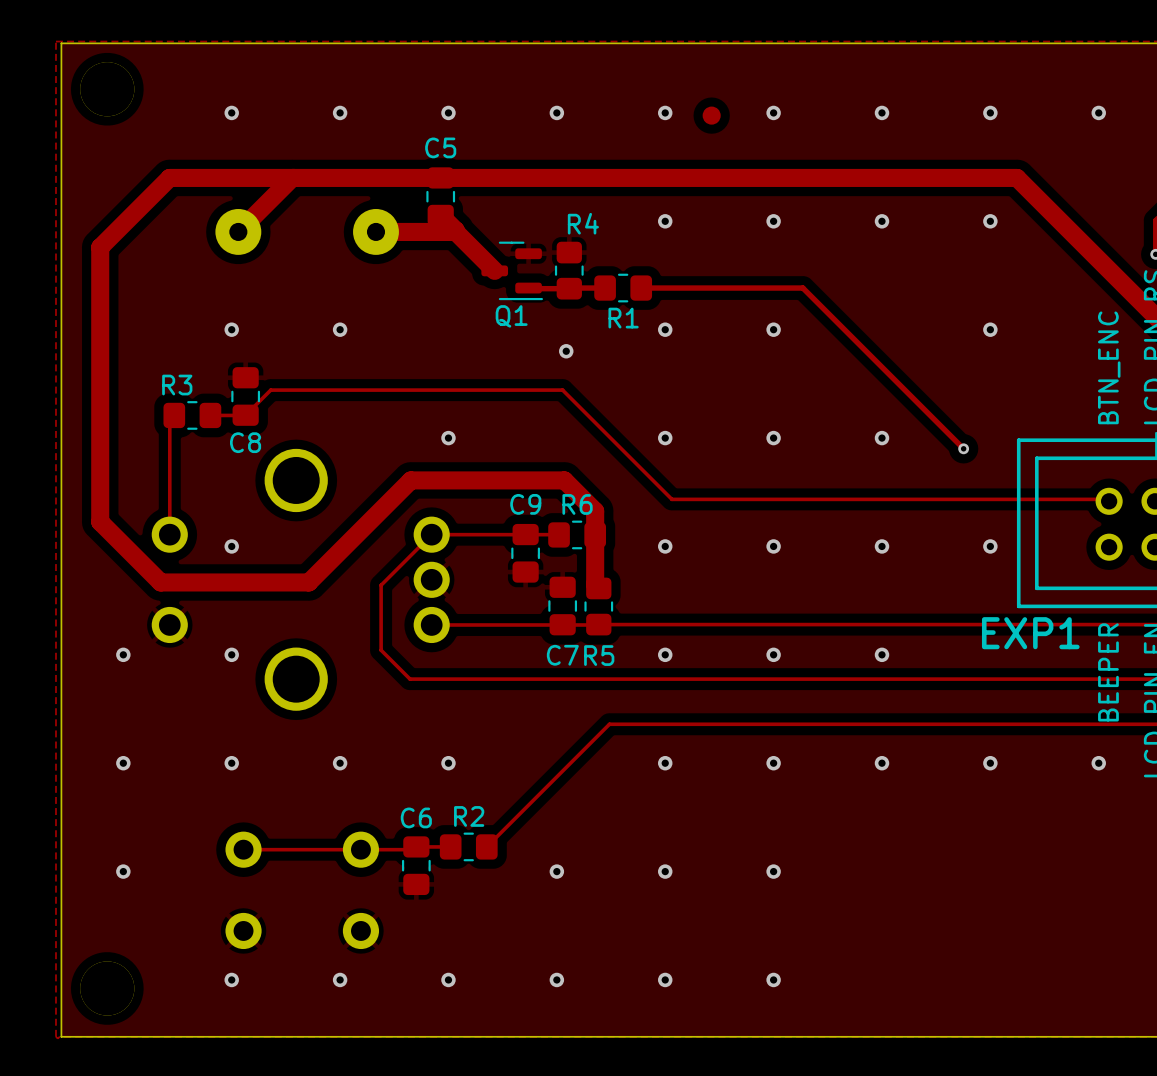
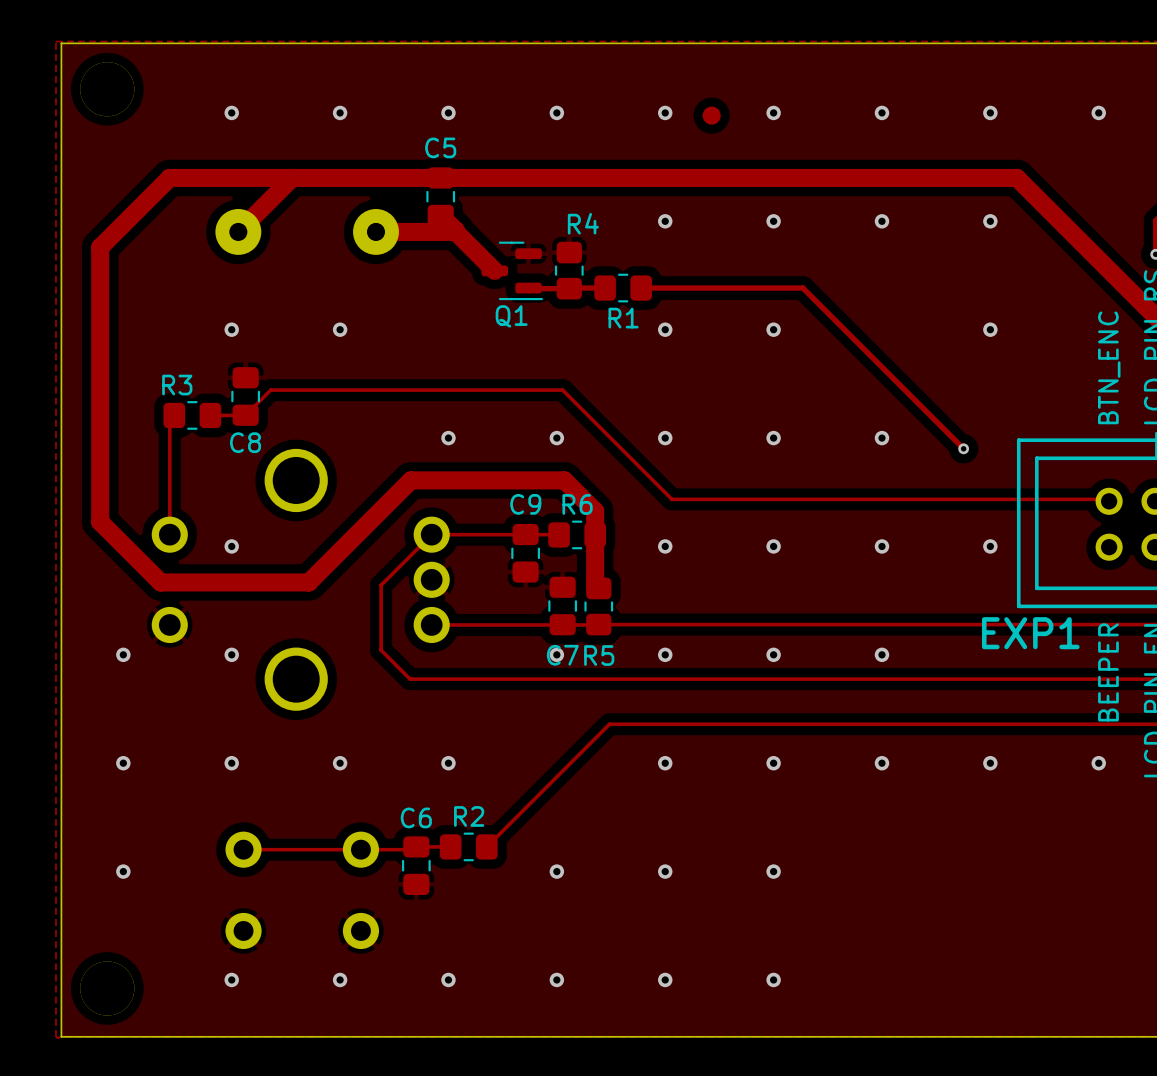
via position: (566, 351) -> (556, 438)
via: none -> (556, 654)

